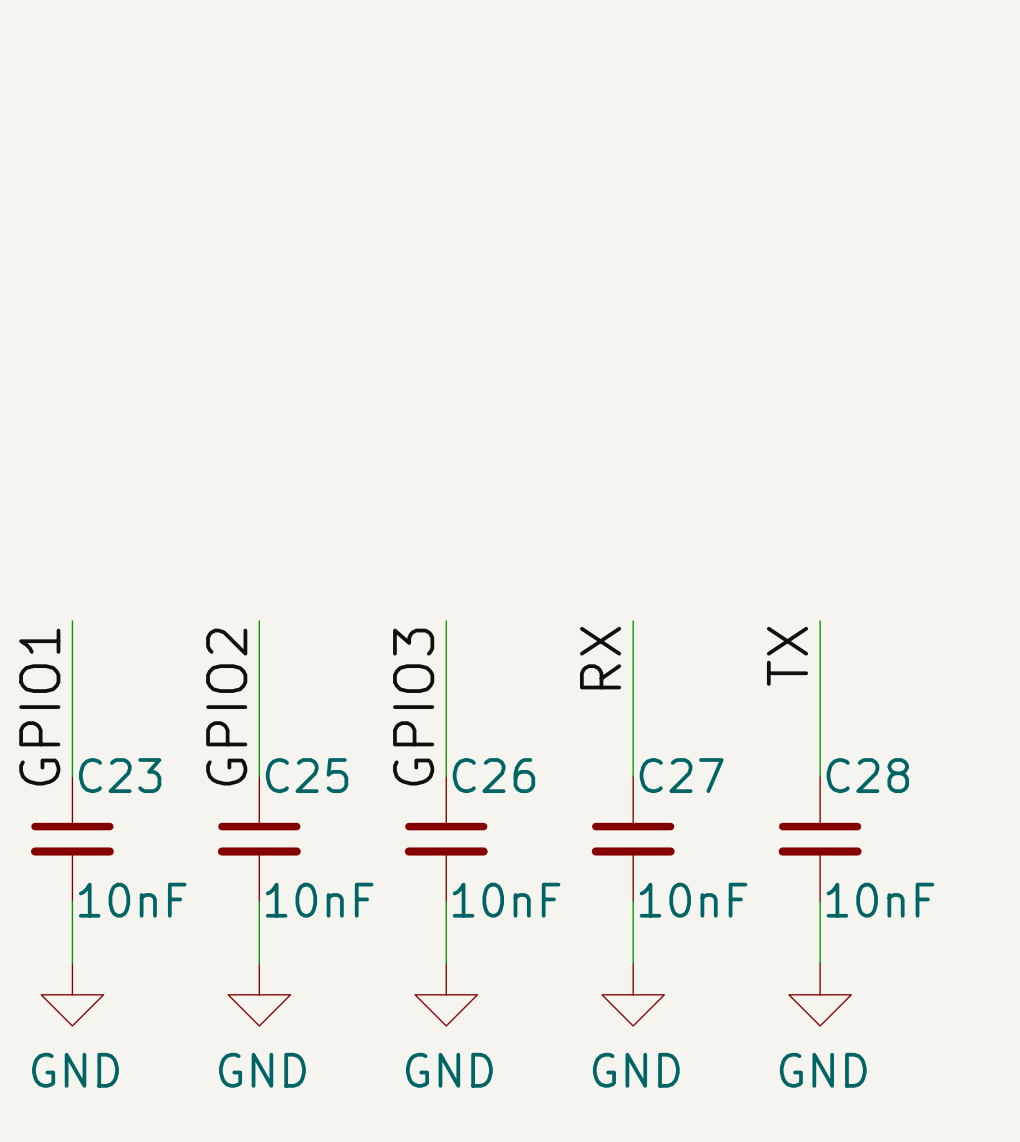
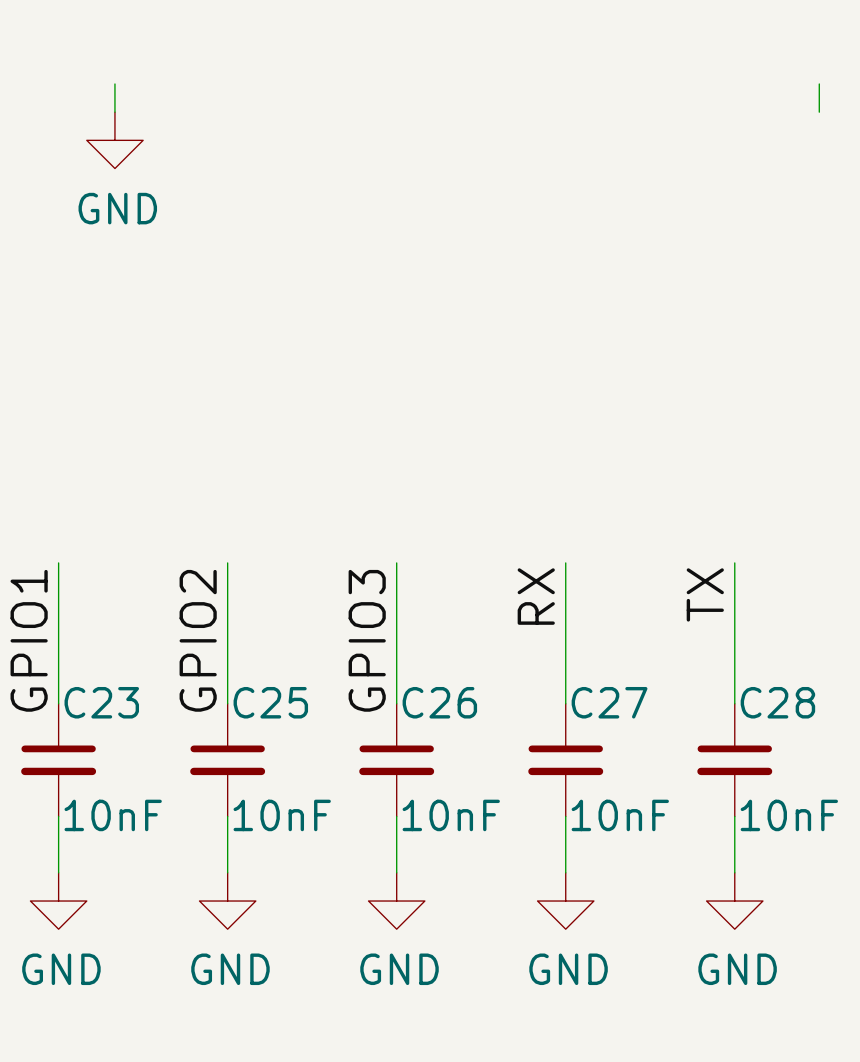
wire: none -> (114, 84) (114, 112)
wire: none -> (819, 84) (819, 112)
power symbol: none -> GND (114, 140)

